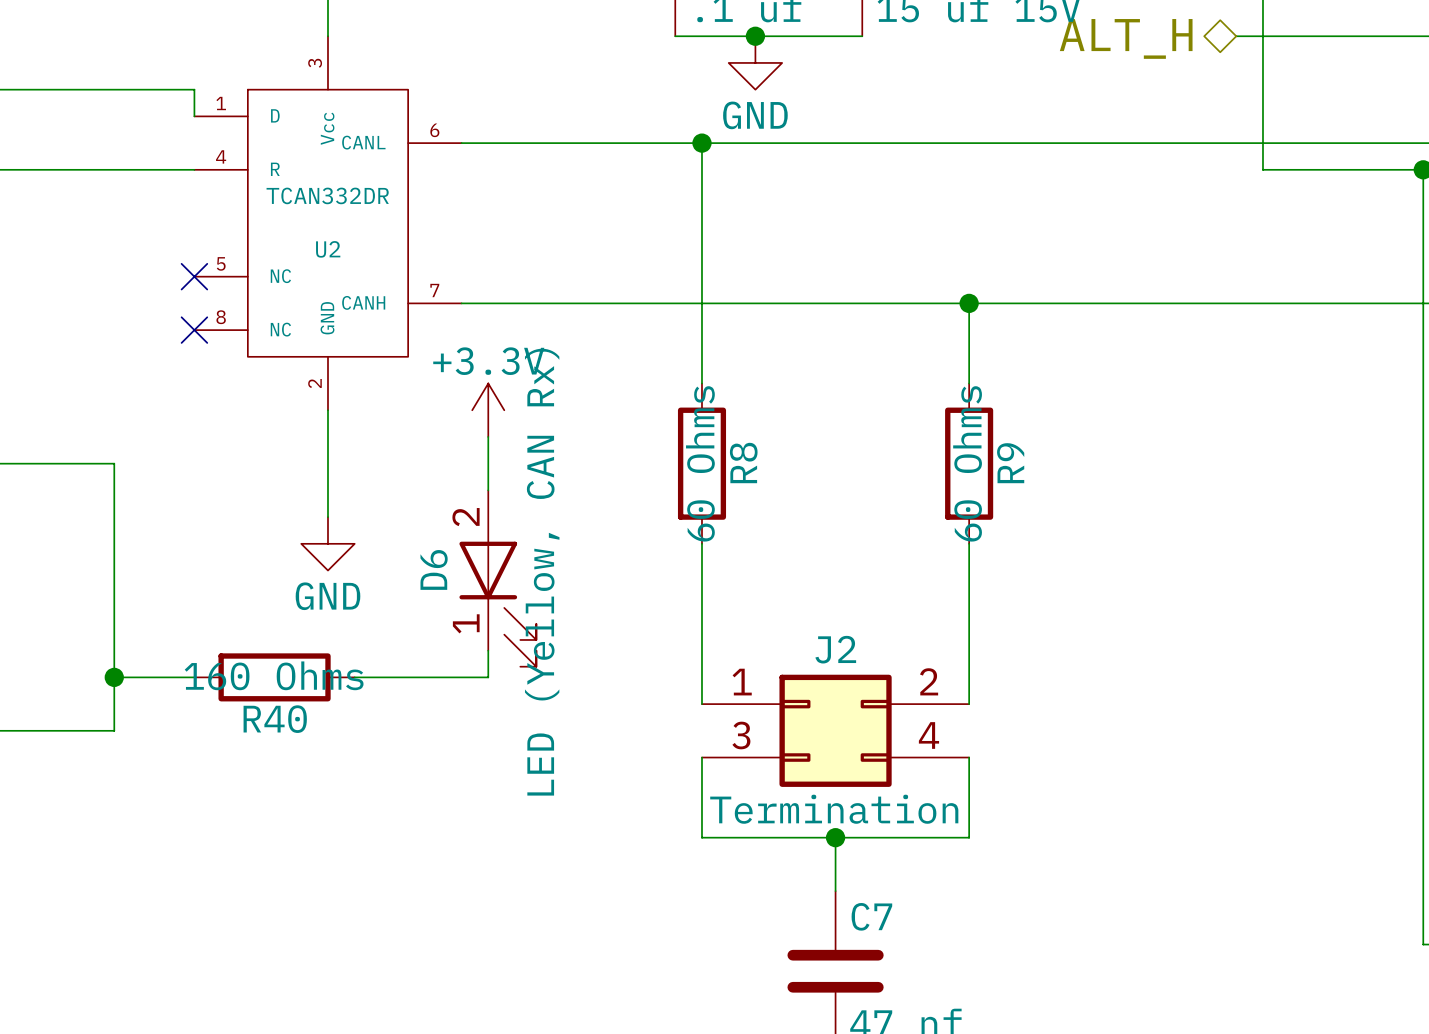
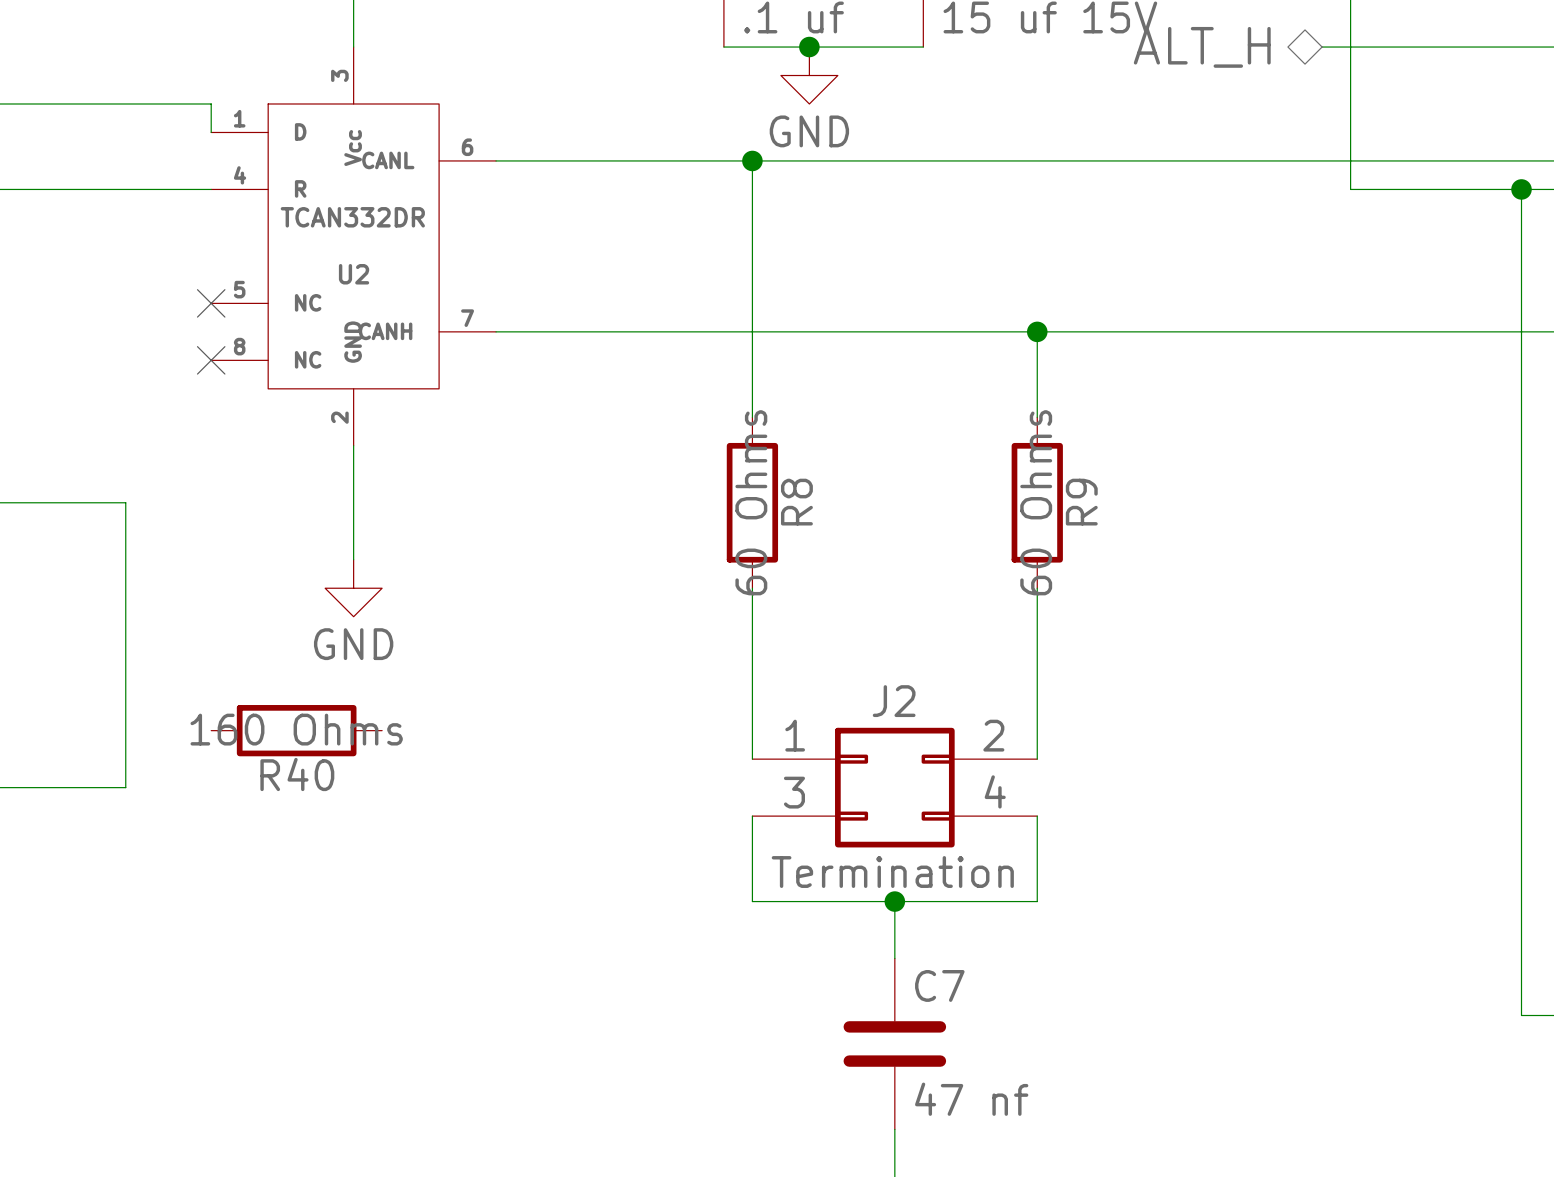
power symbol: +3.3V (488, 410) -> none
wire: (488, 436) (488, 490) -> none
D6: LED (Yellow, CAN Rx) (497, 578) -> none
wire: (488, 650) (488, 677) (354, 677) -> none
wire: (114, 677) (194, 677) -> none
junction: (114, 677) -> none

